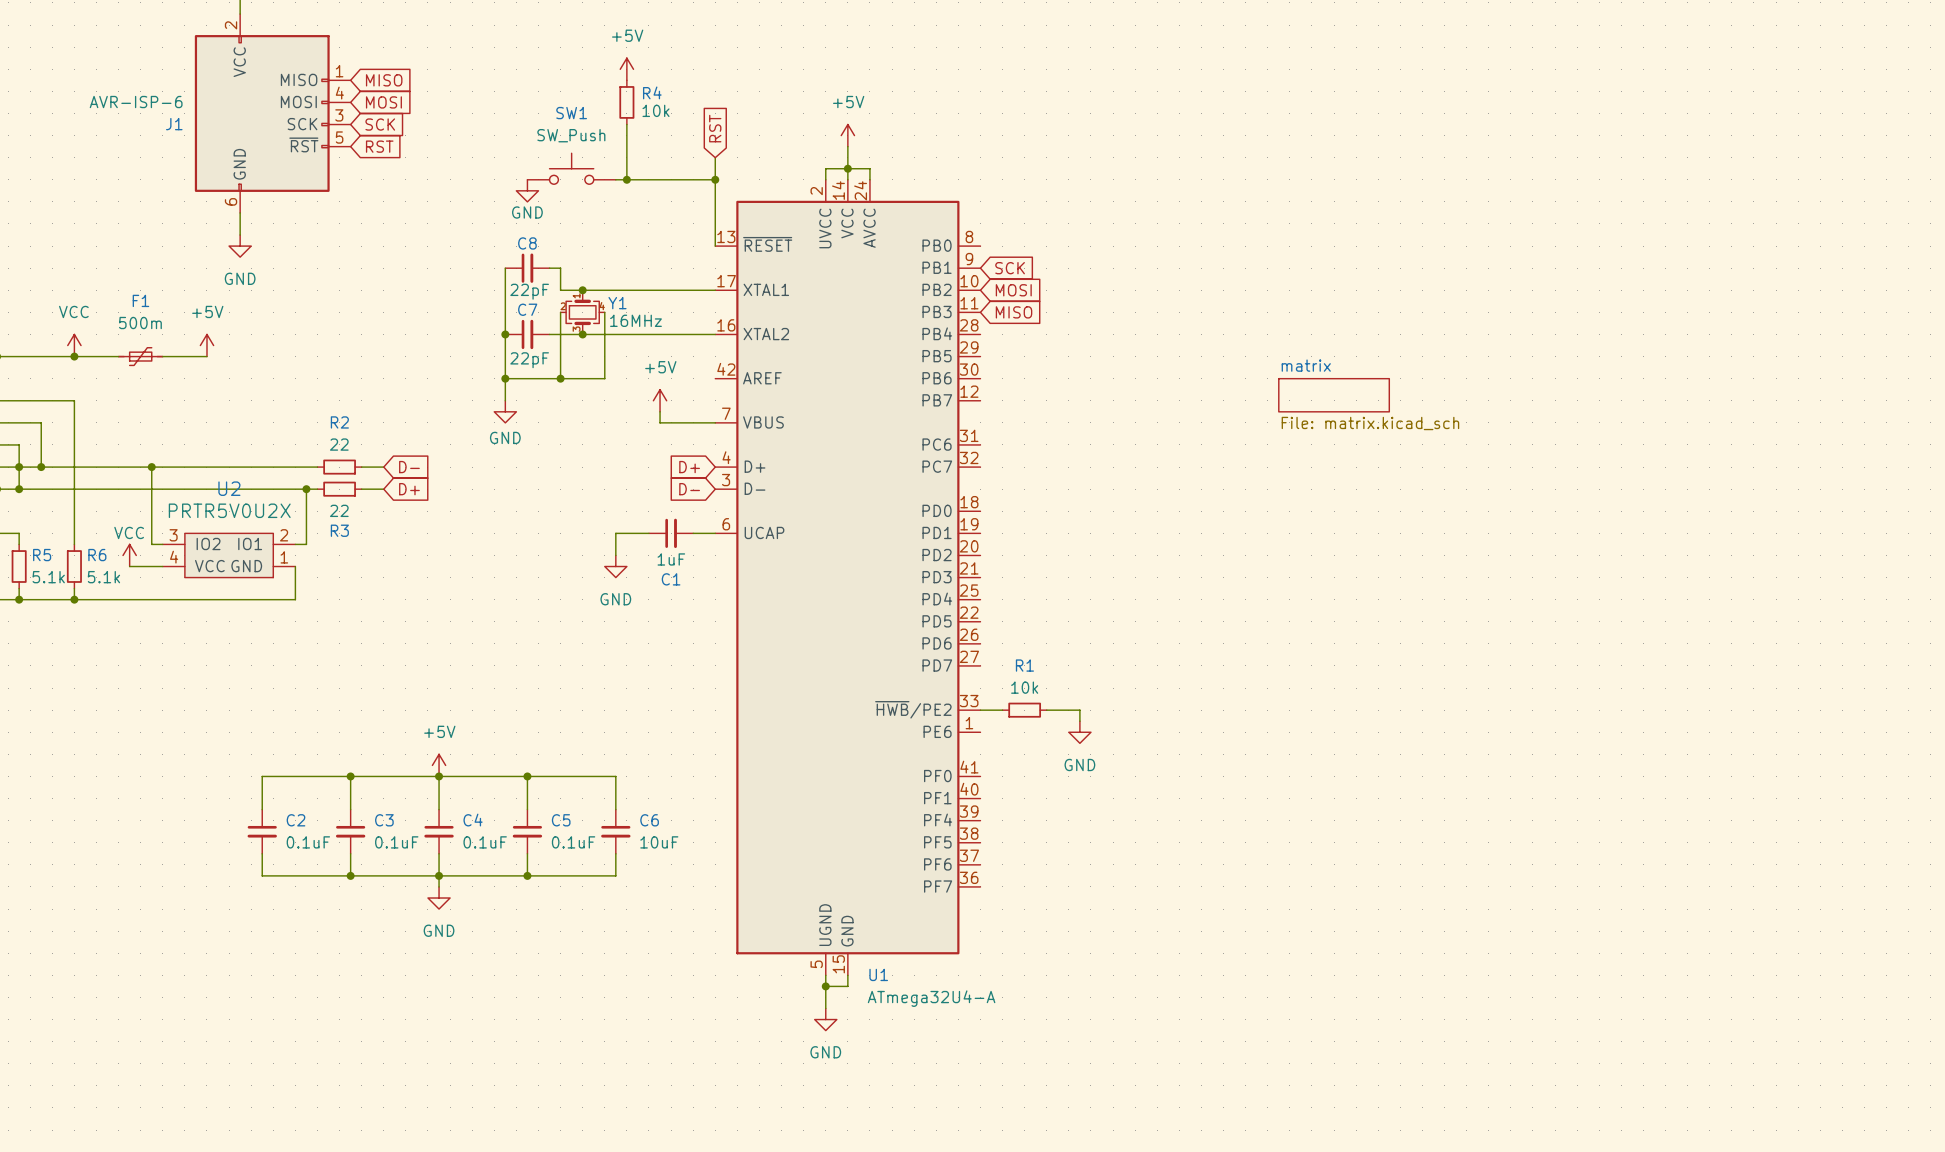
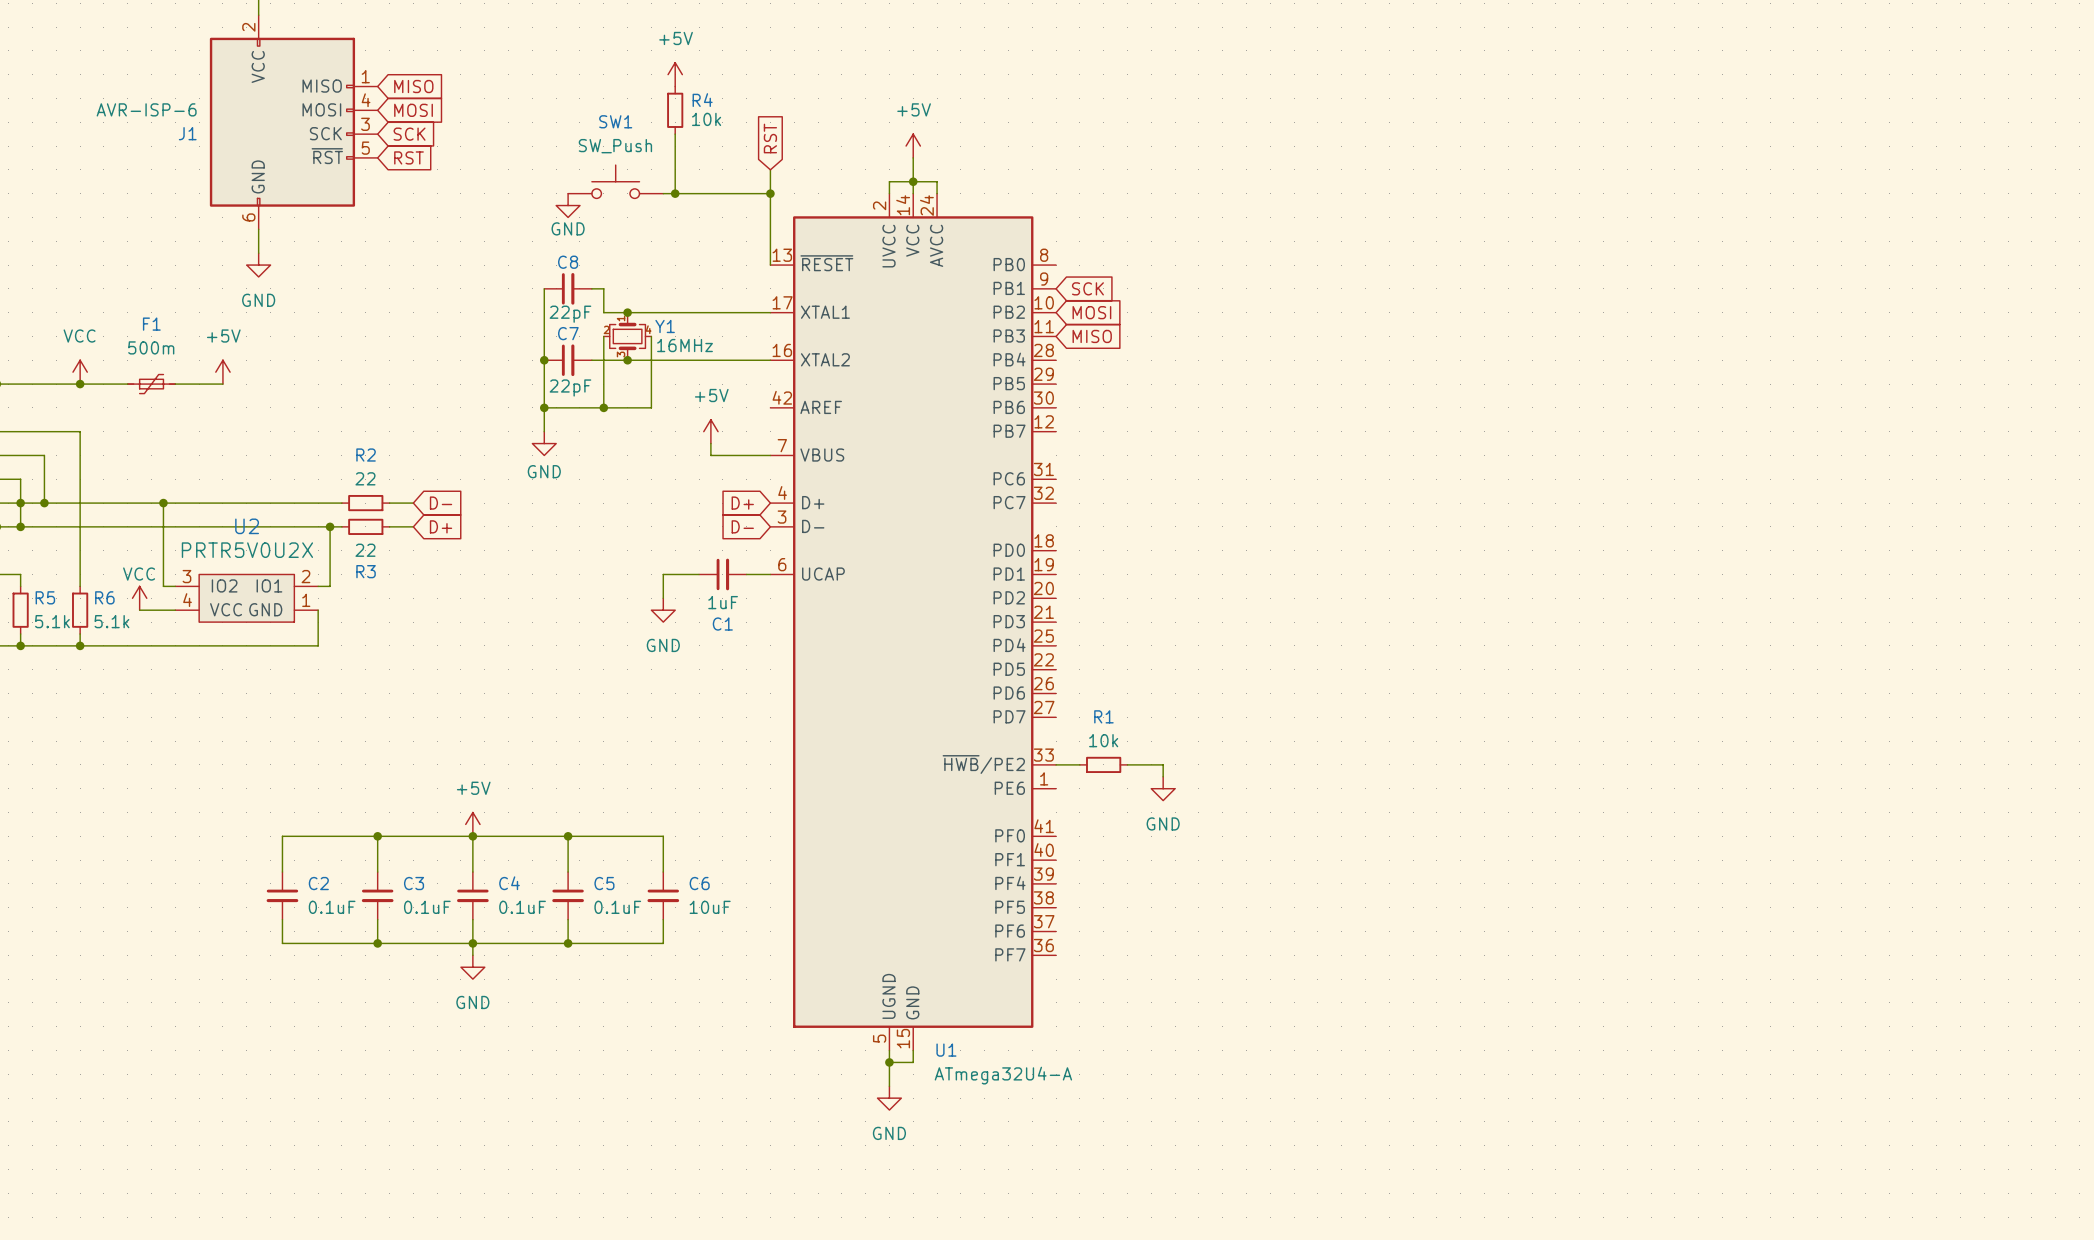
sheet matrix: File: matrix.kicad_sch (1334, 395) -> none

